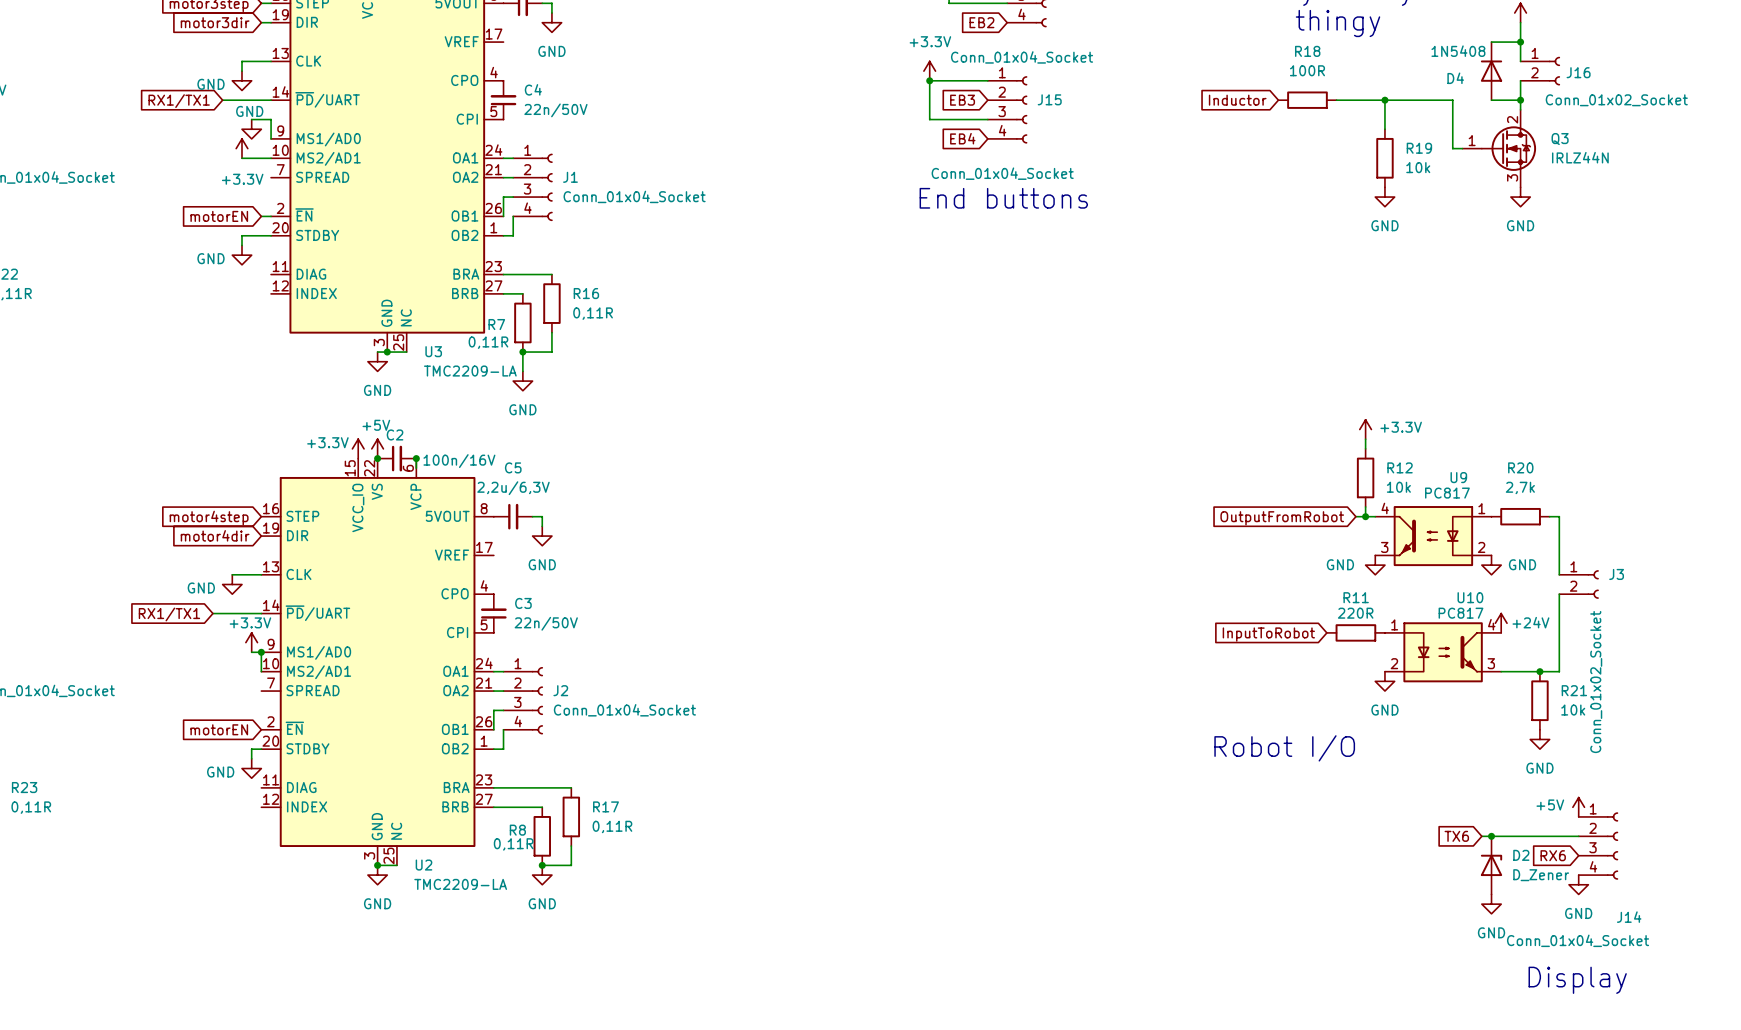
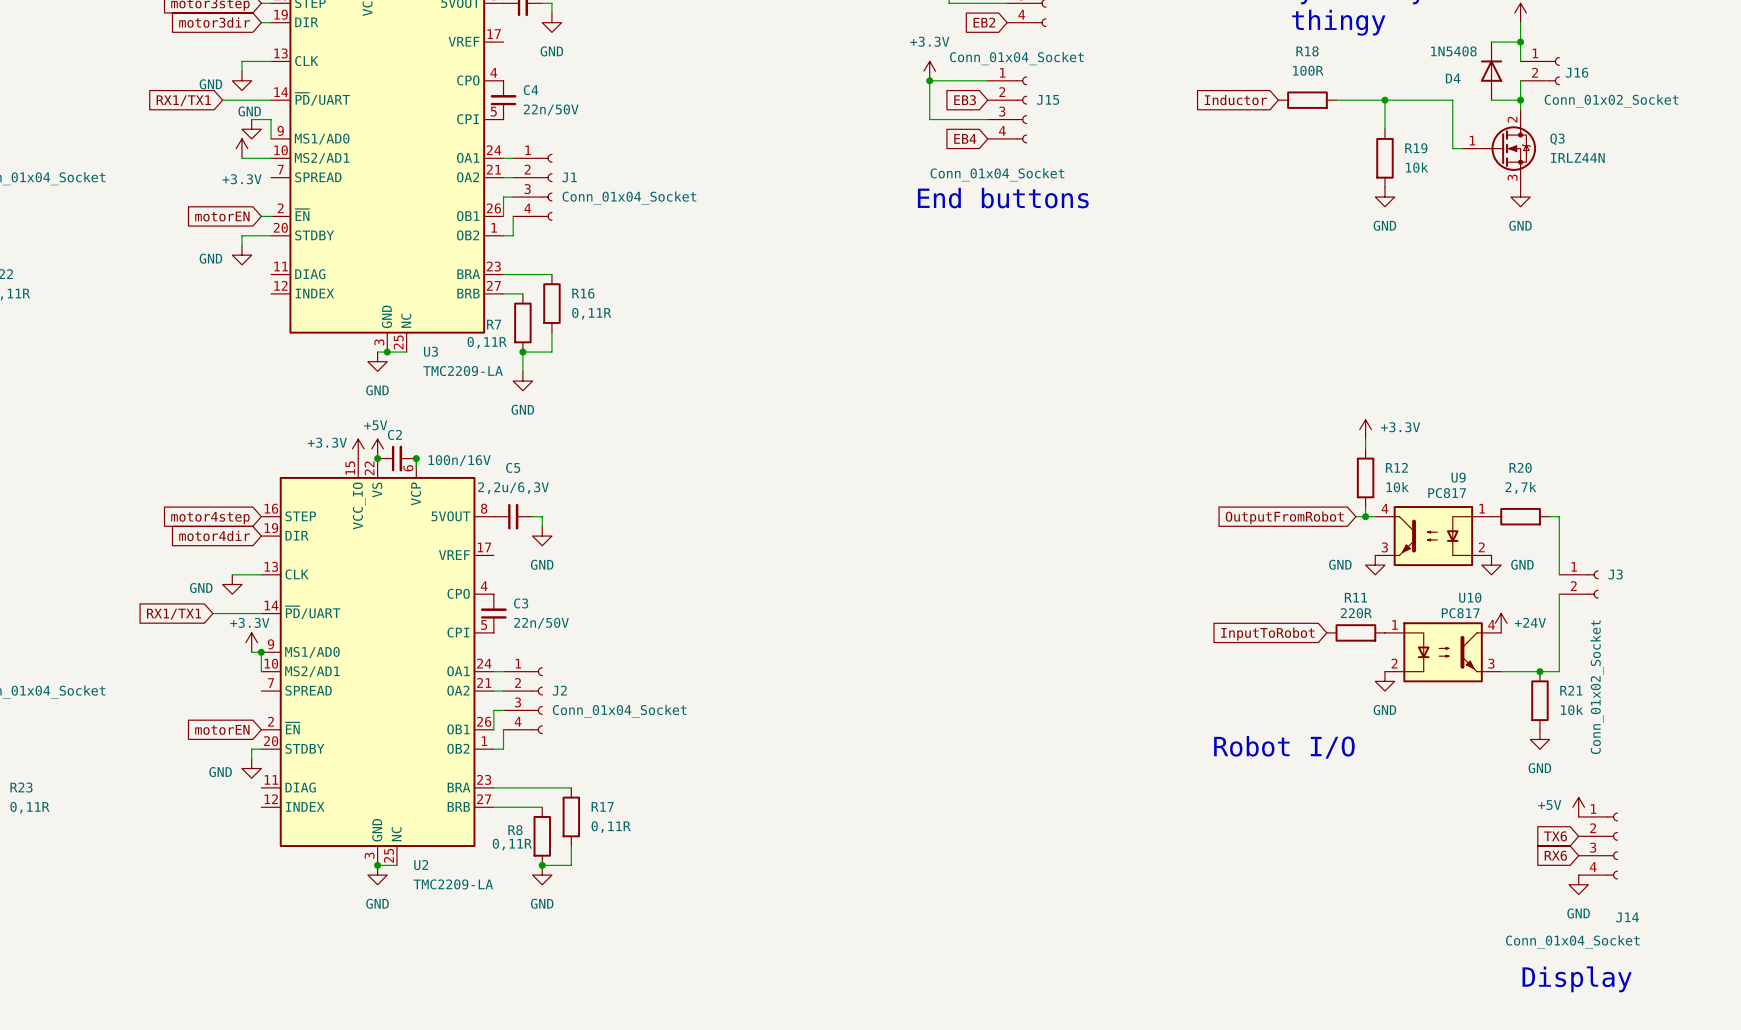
global label position: TX6 (1456, 836) -> TX6 (1555, 836)
wire: (1481, 836) (1578, 836) -> none
junction: (1491, 836) -> none
D2: D_Zener (1491, 865) -> none
power symbol: GND (1491, 904) -> none

